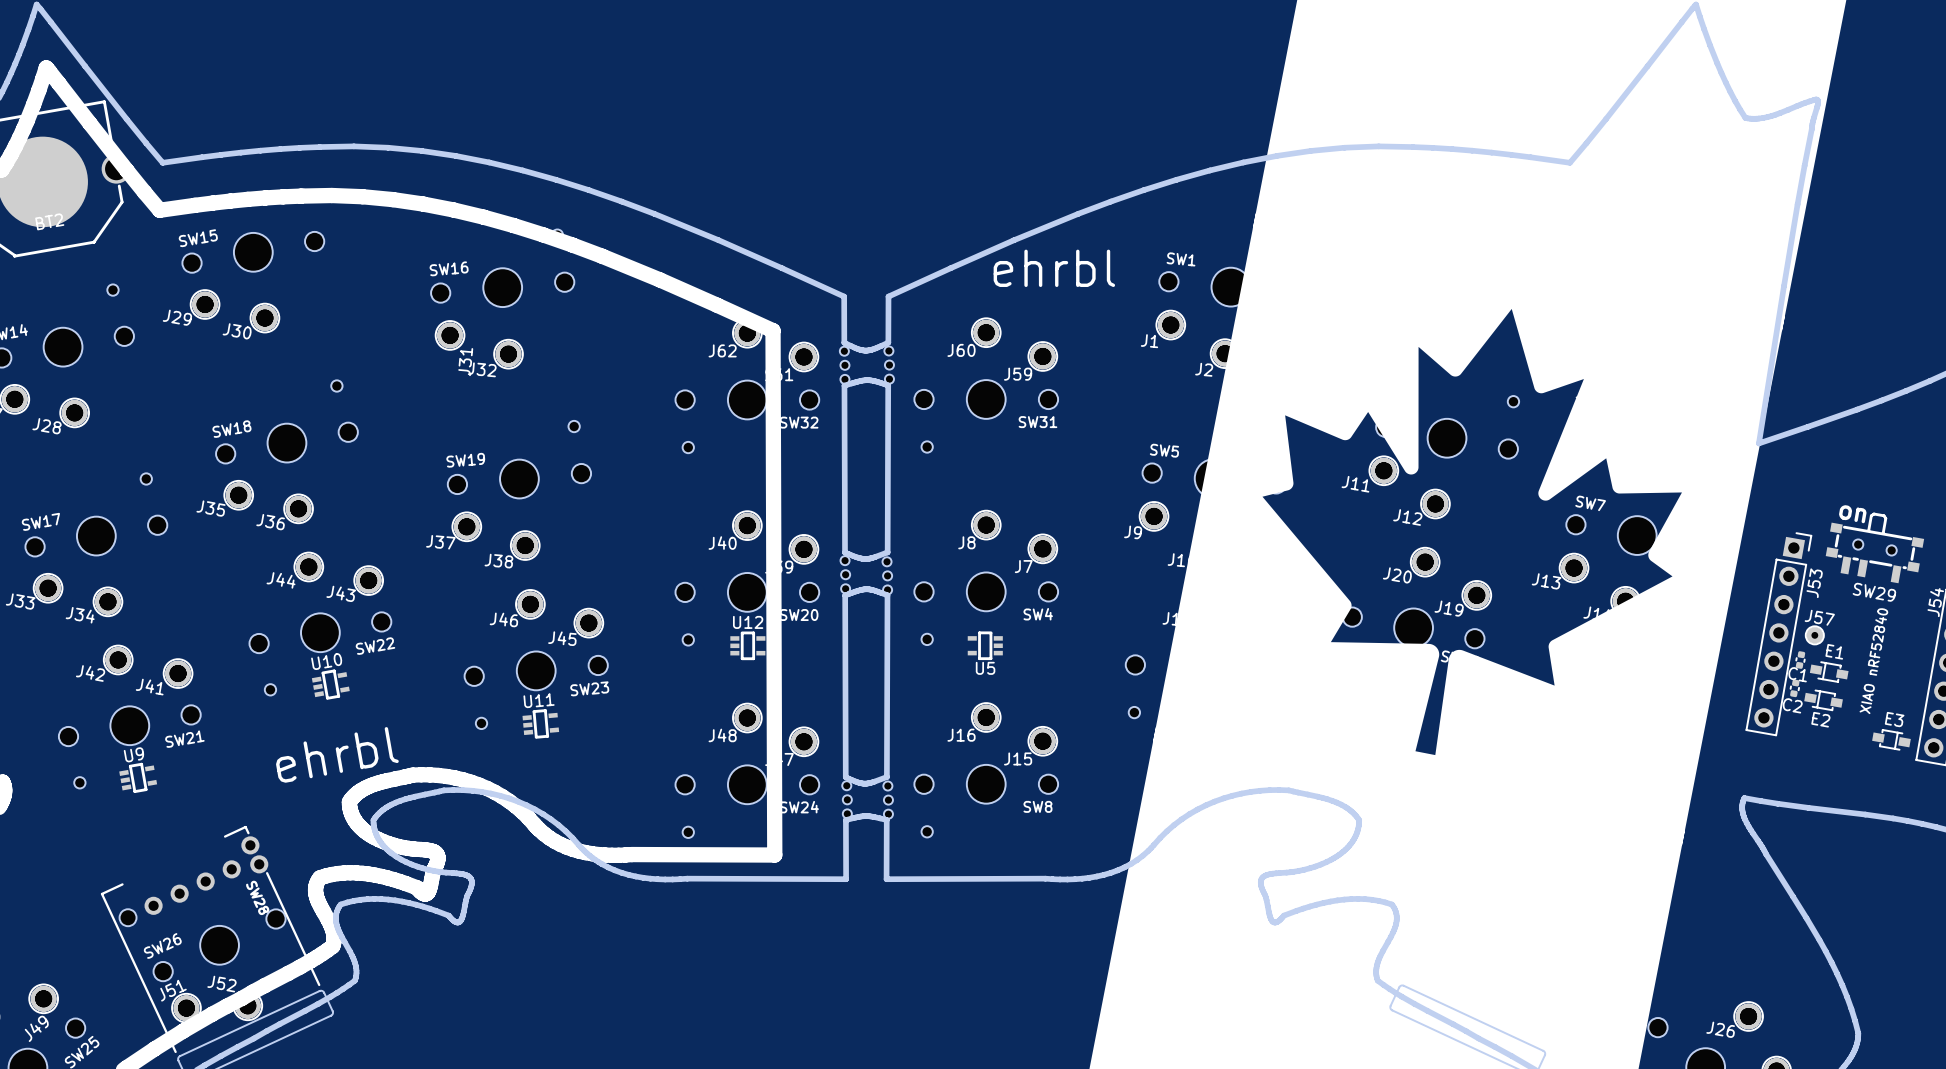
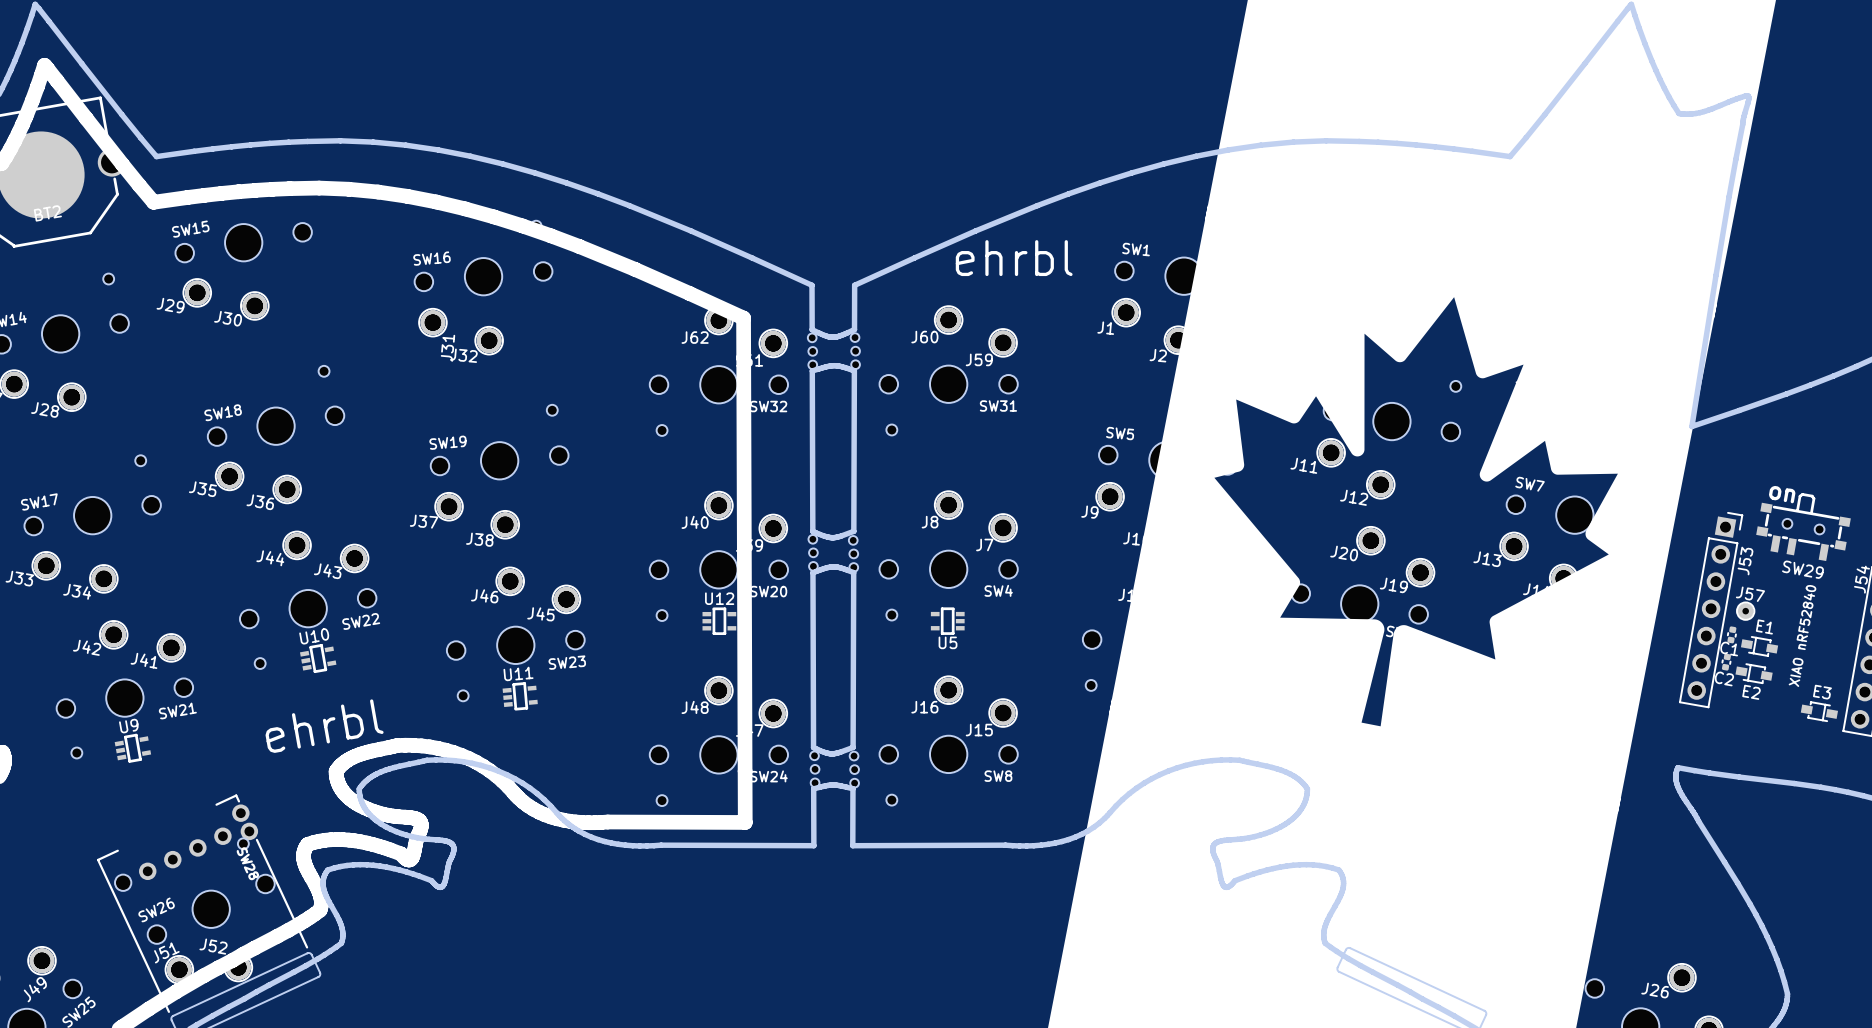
SW26 footprint: [153, 909, 286, 1021] -> [147, 838, 275, 983]

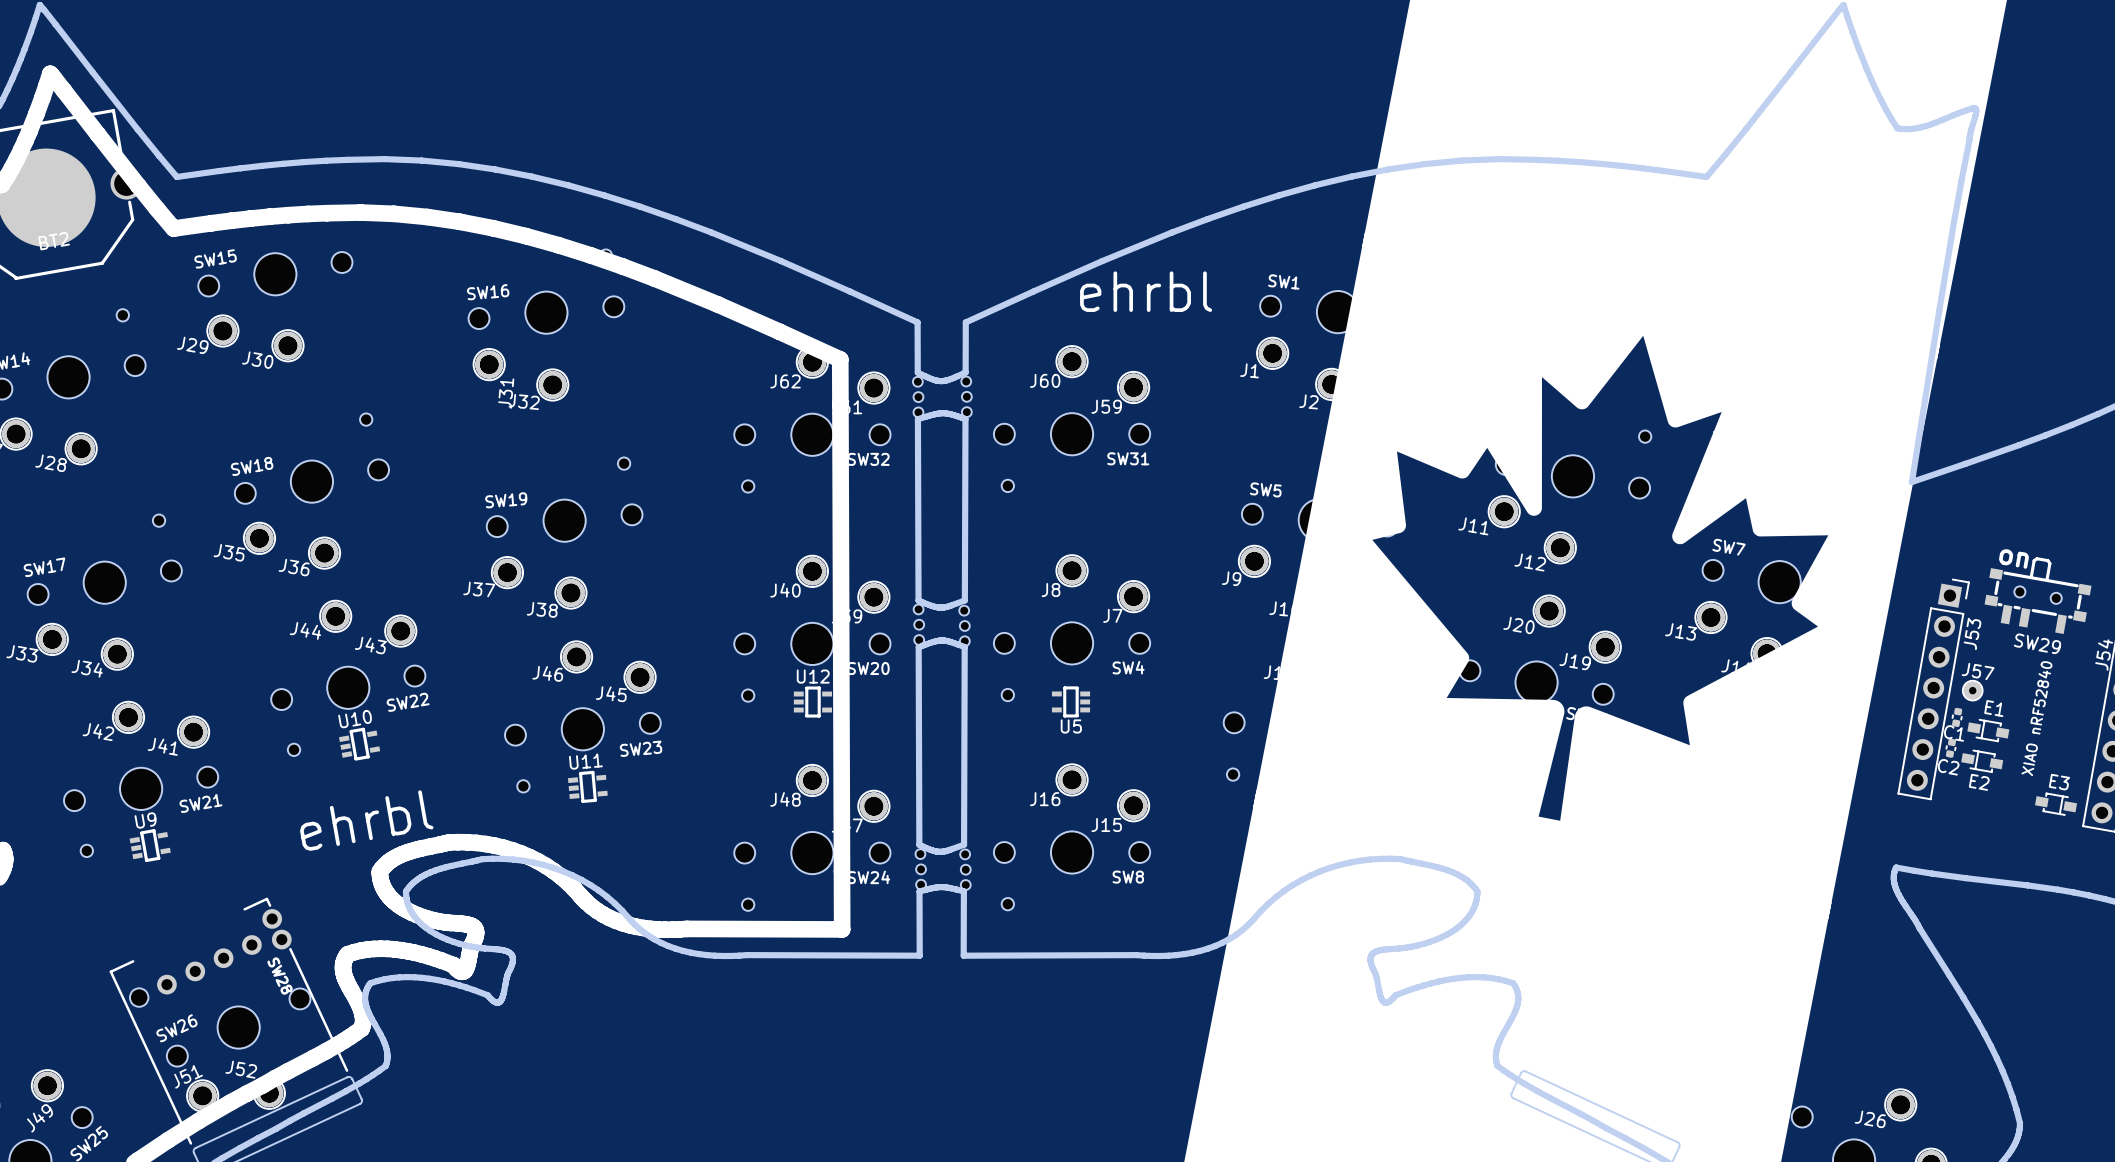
SW26 footprint: [147, 838, 275, 983] -> [166, 988, 311, 1110]

